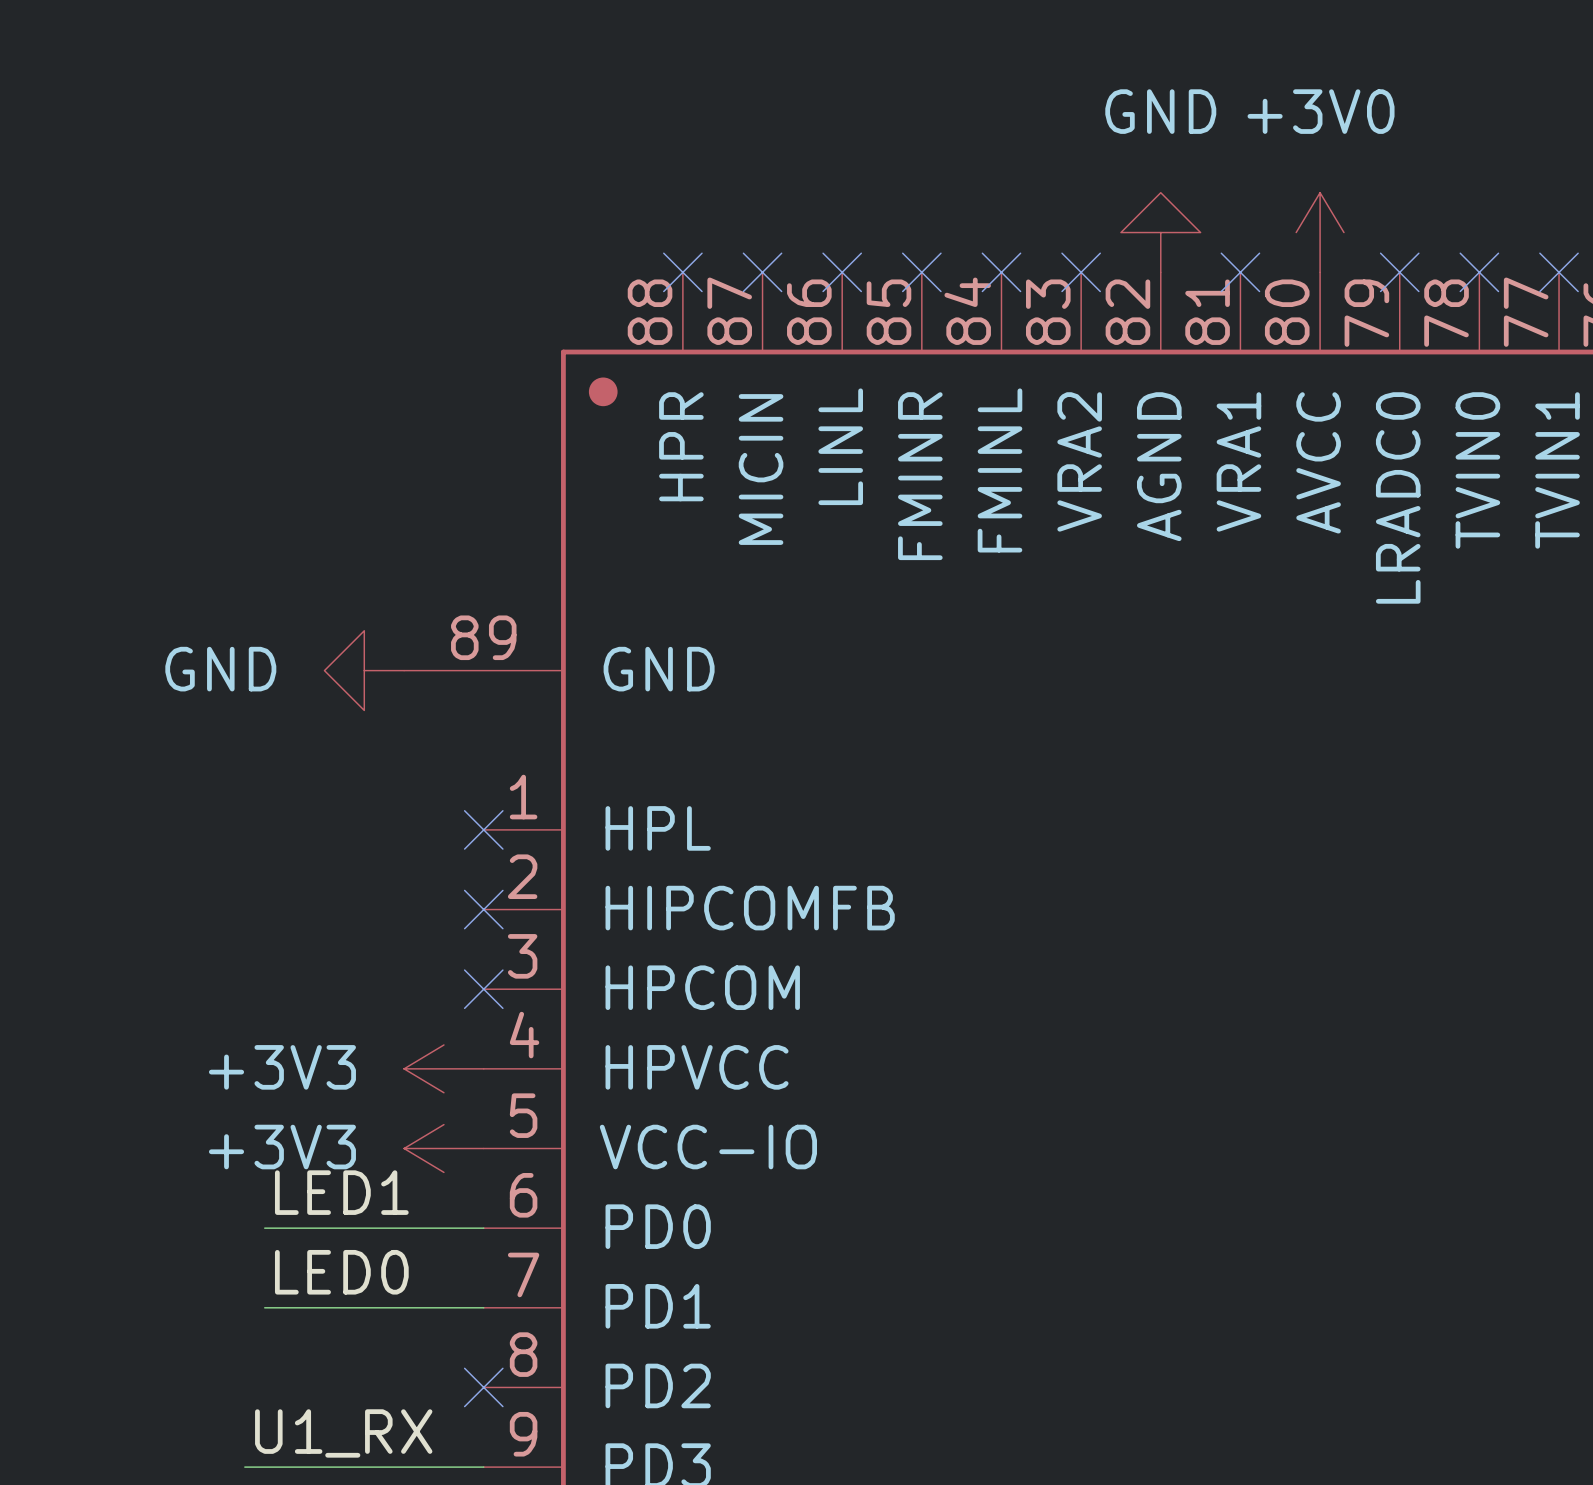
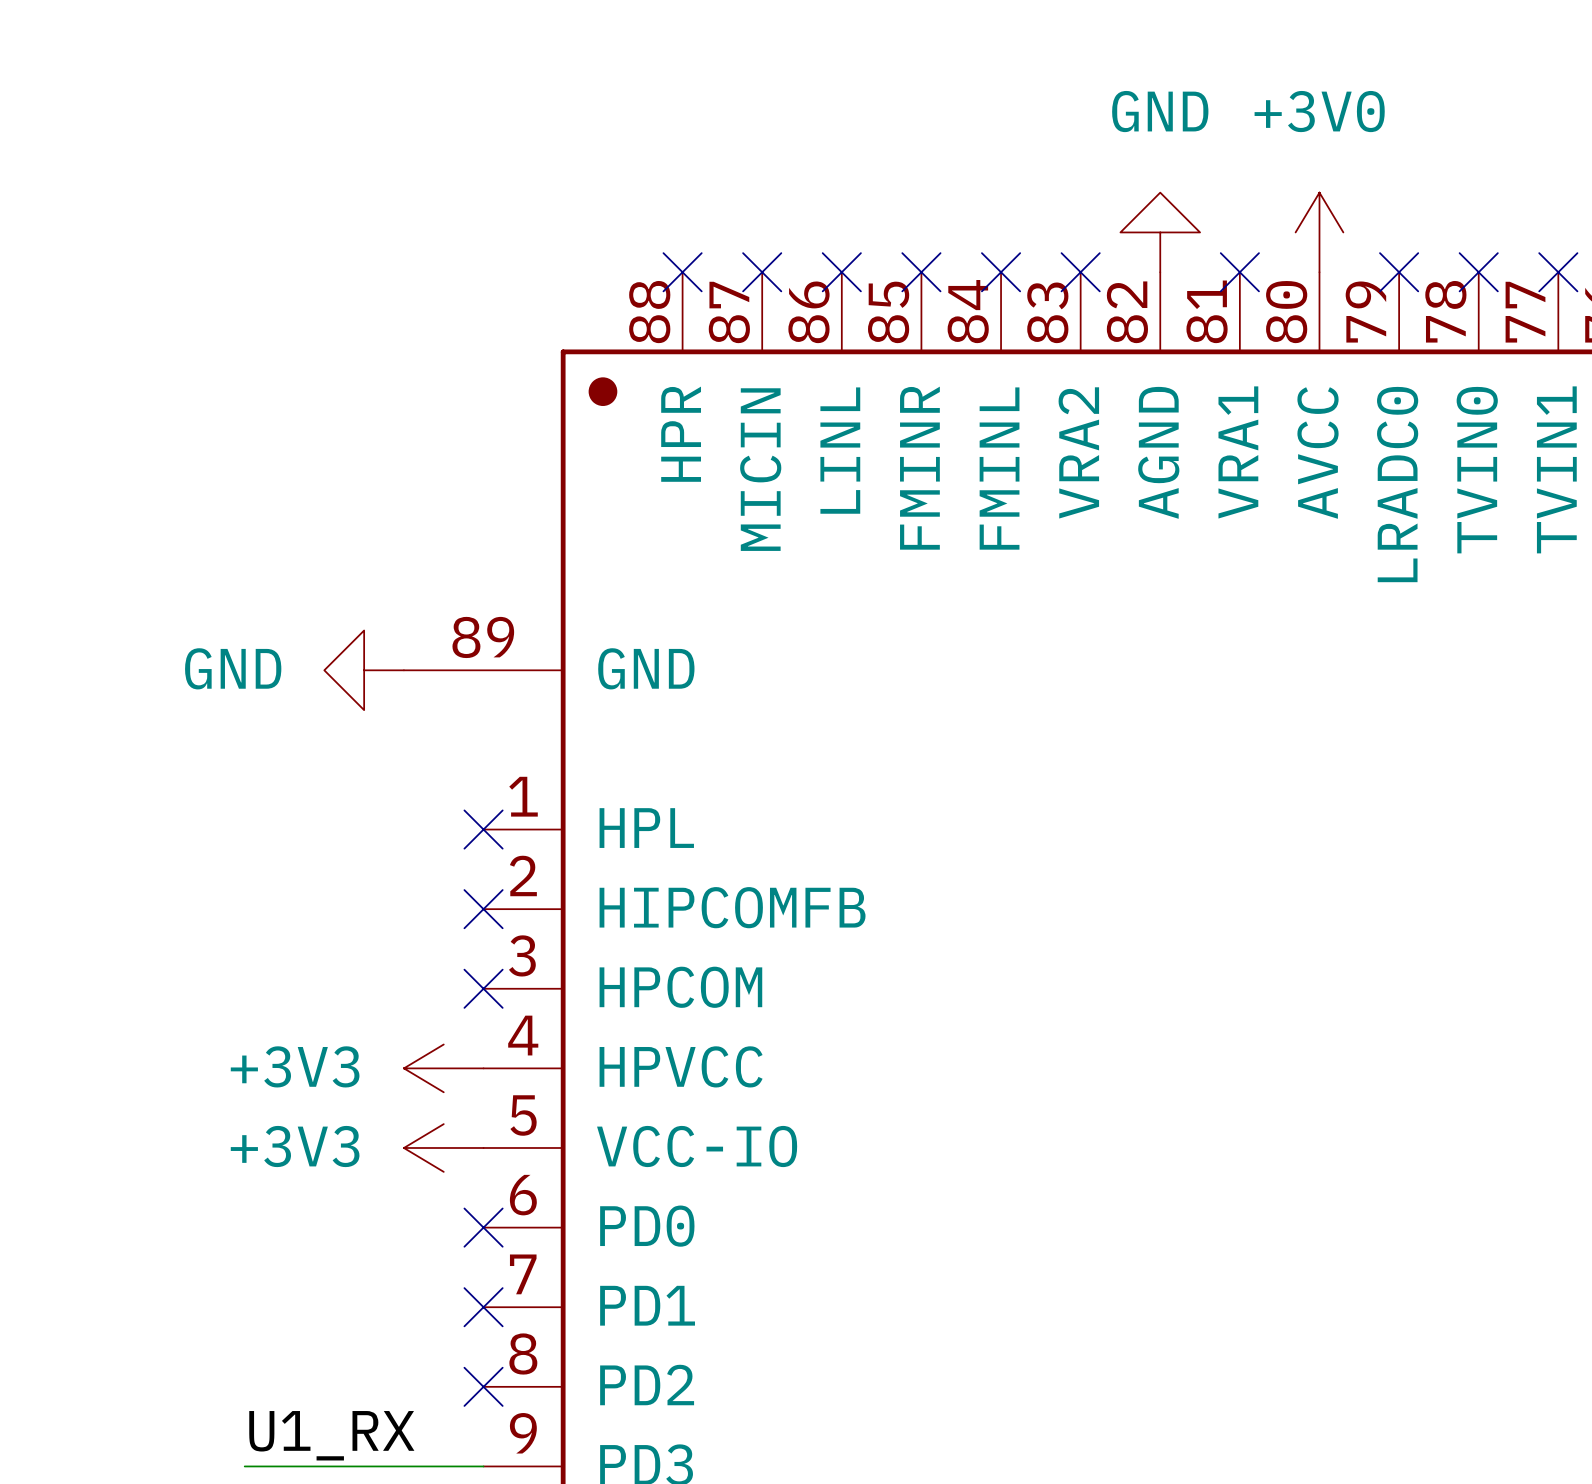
label: LED1 (341, 1192) -> none
wire: (264, 1228) (483, 1228) -> none
no-connect mark: none -> (483, 1227)
label: LED0 (341, 1272) -> none
wire: (264, 1307) (483, 1307) -> none
no-connect mark: none -> (483, 1307)

